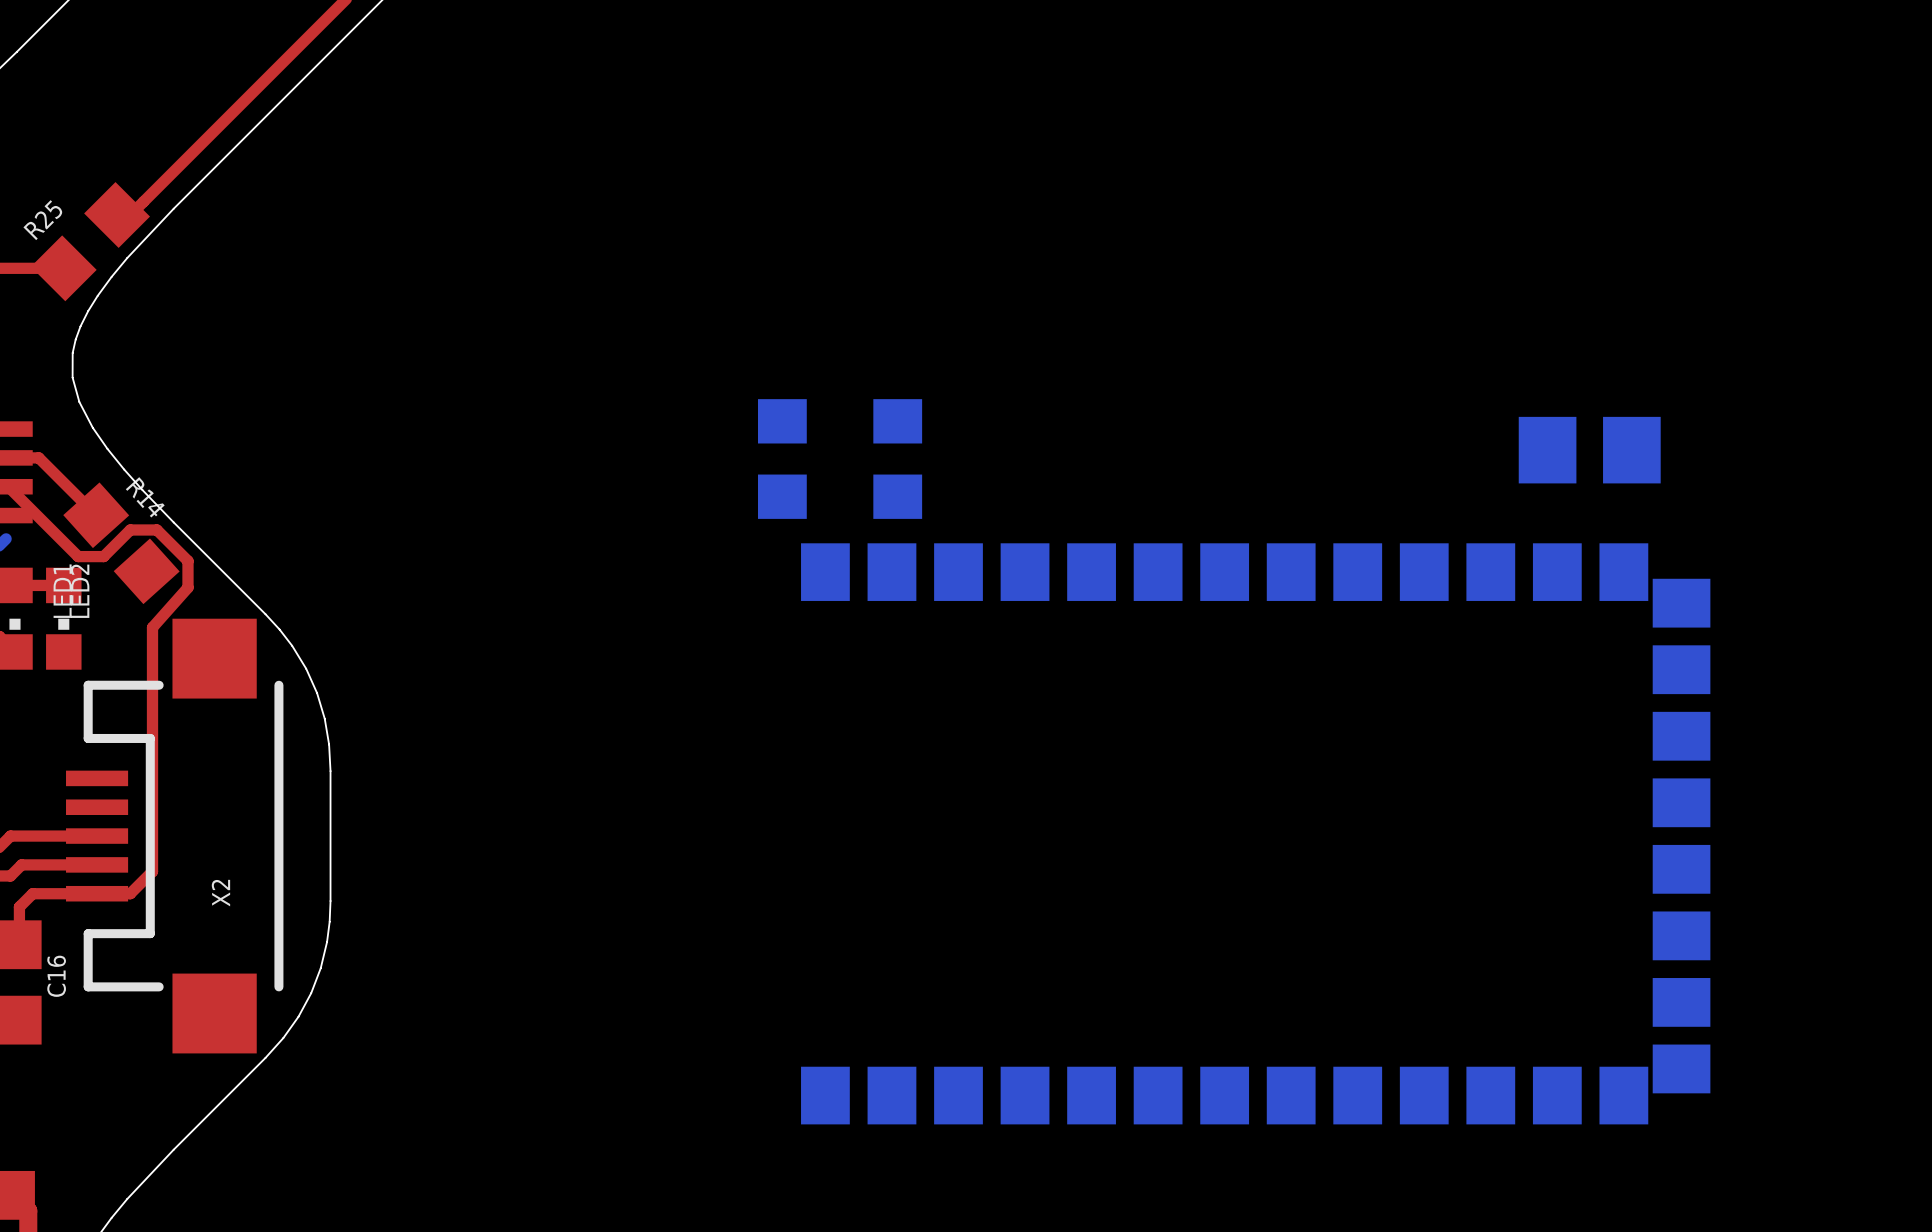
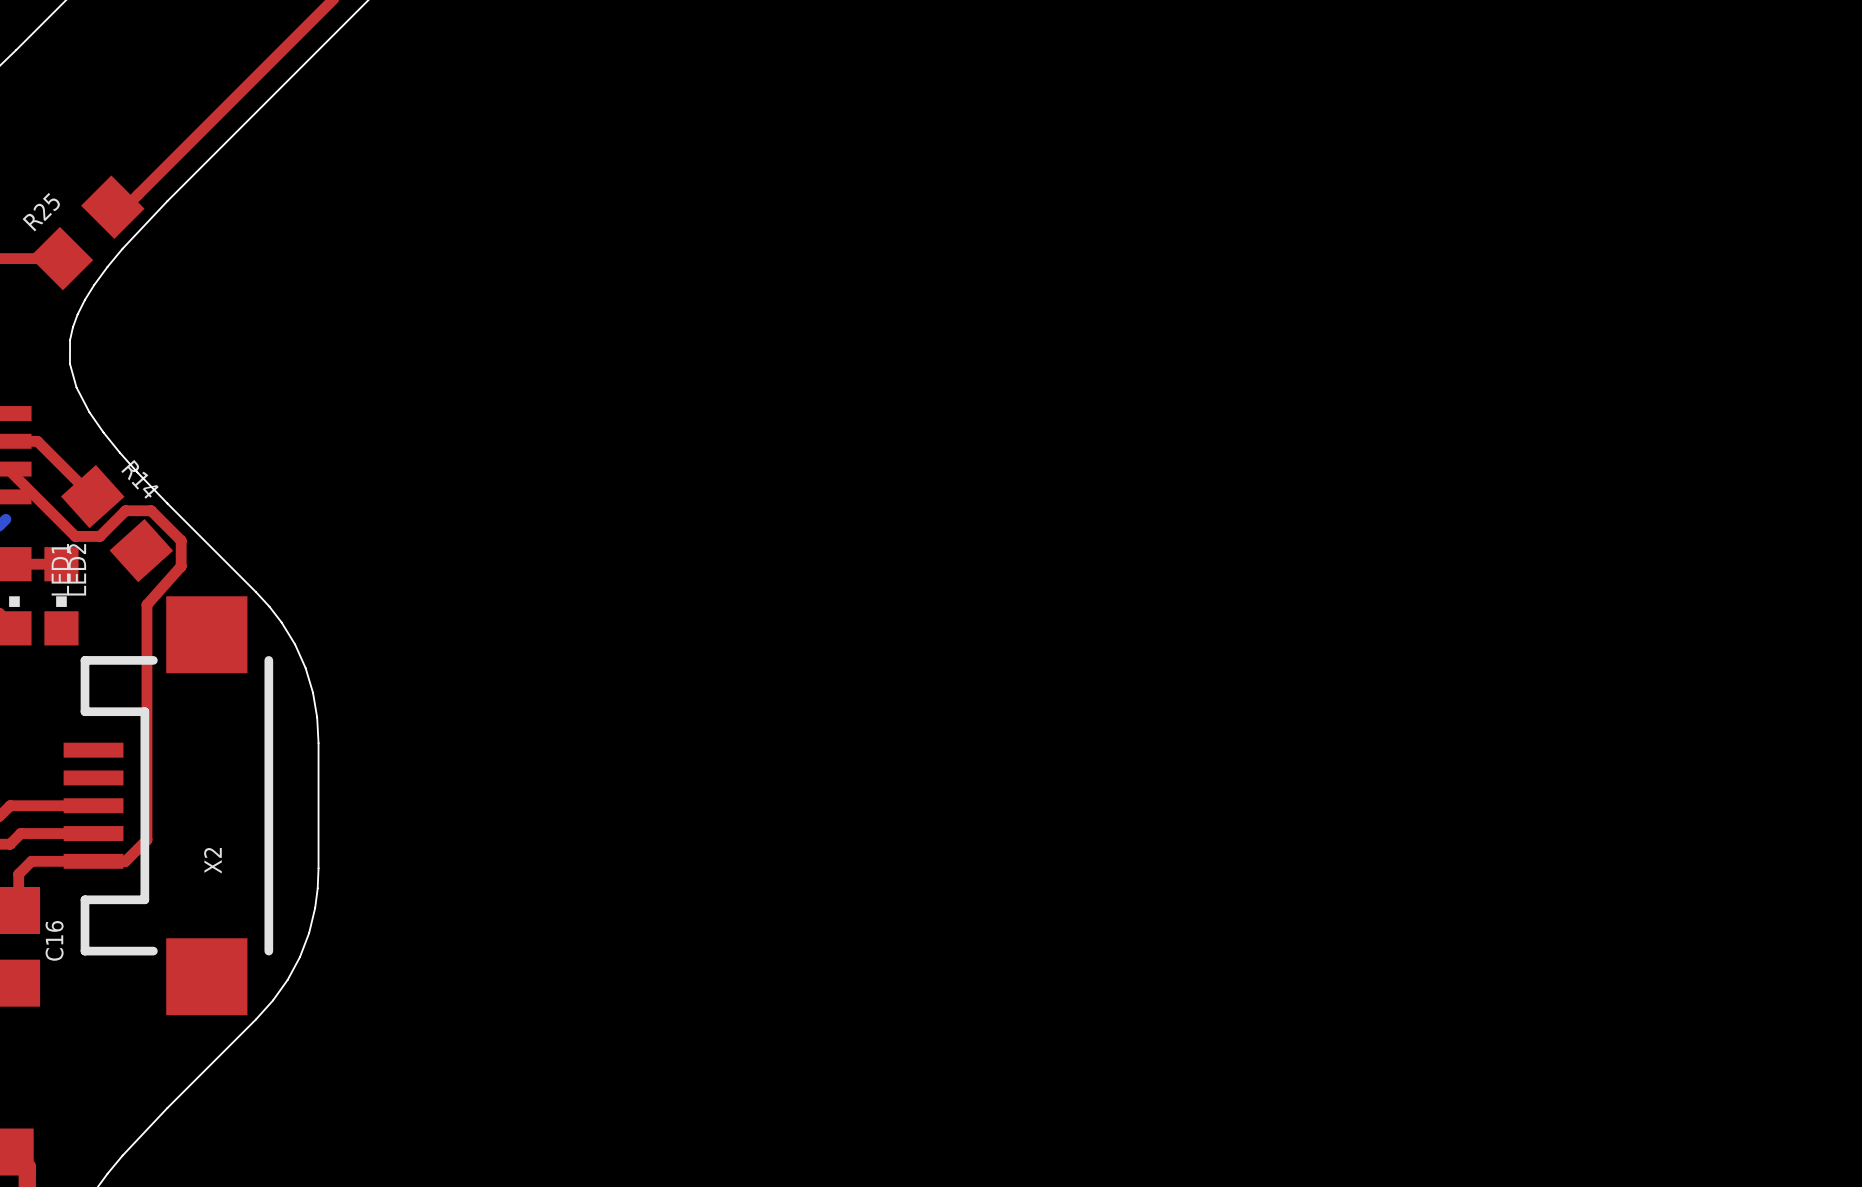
part: (1589, 450) -> none
part: (782, 459) -> none
part: (897, 459) -> none
part: (1255, 833) -> none

